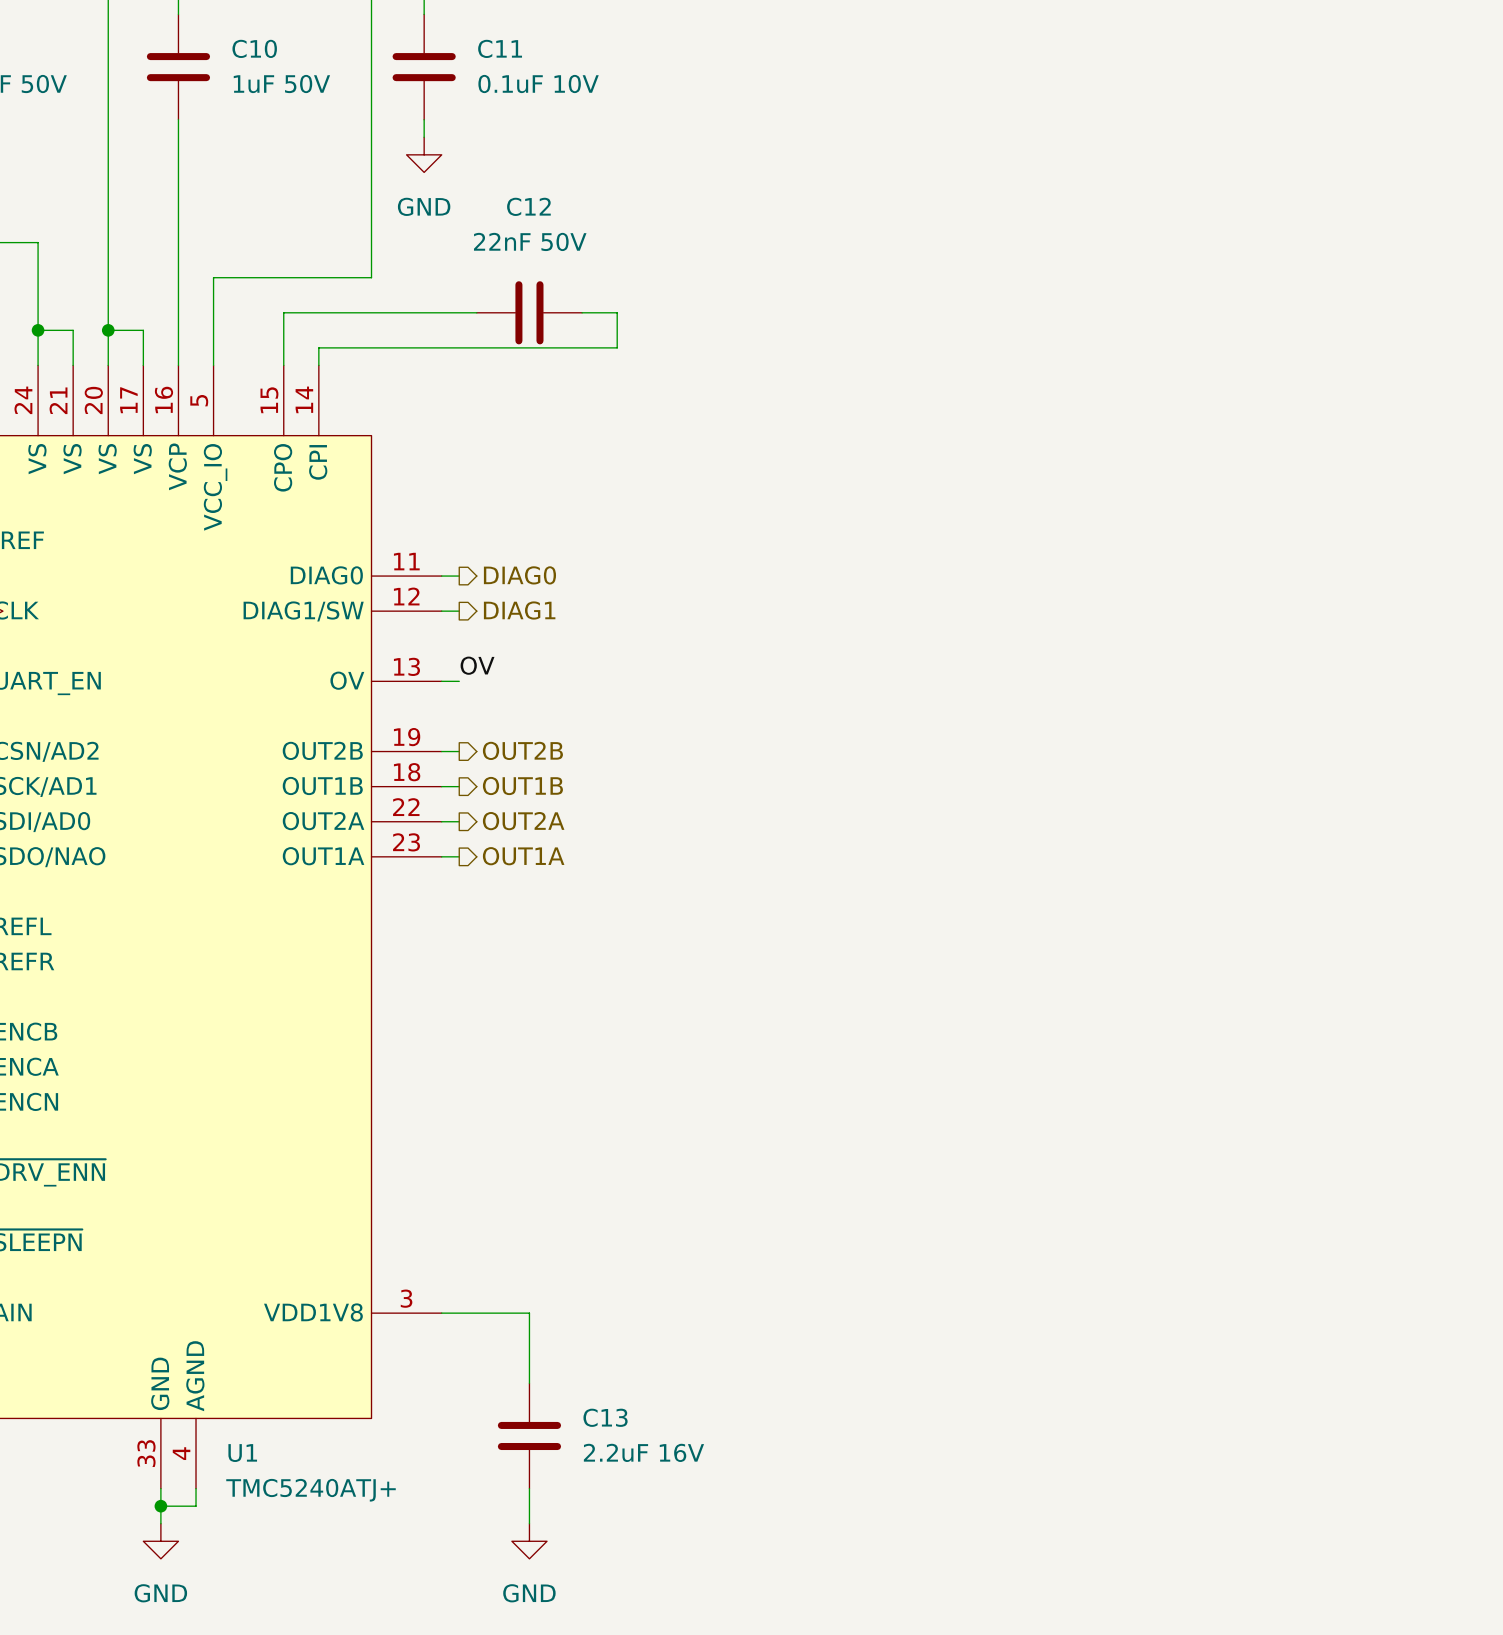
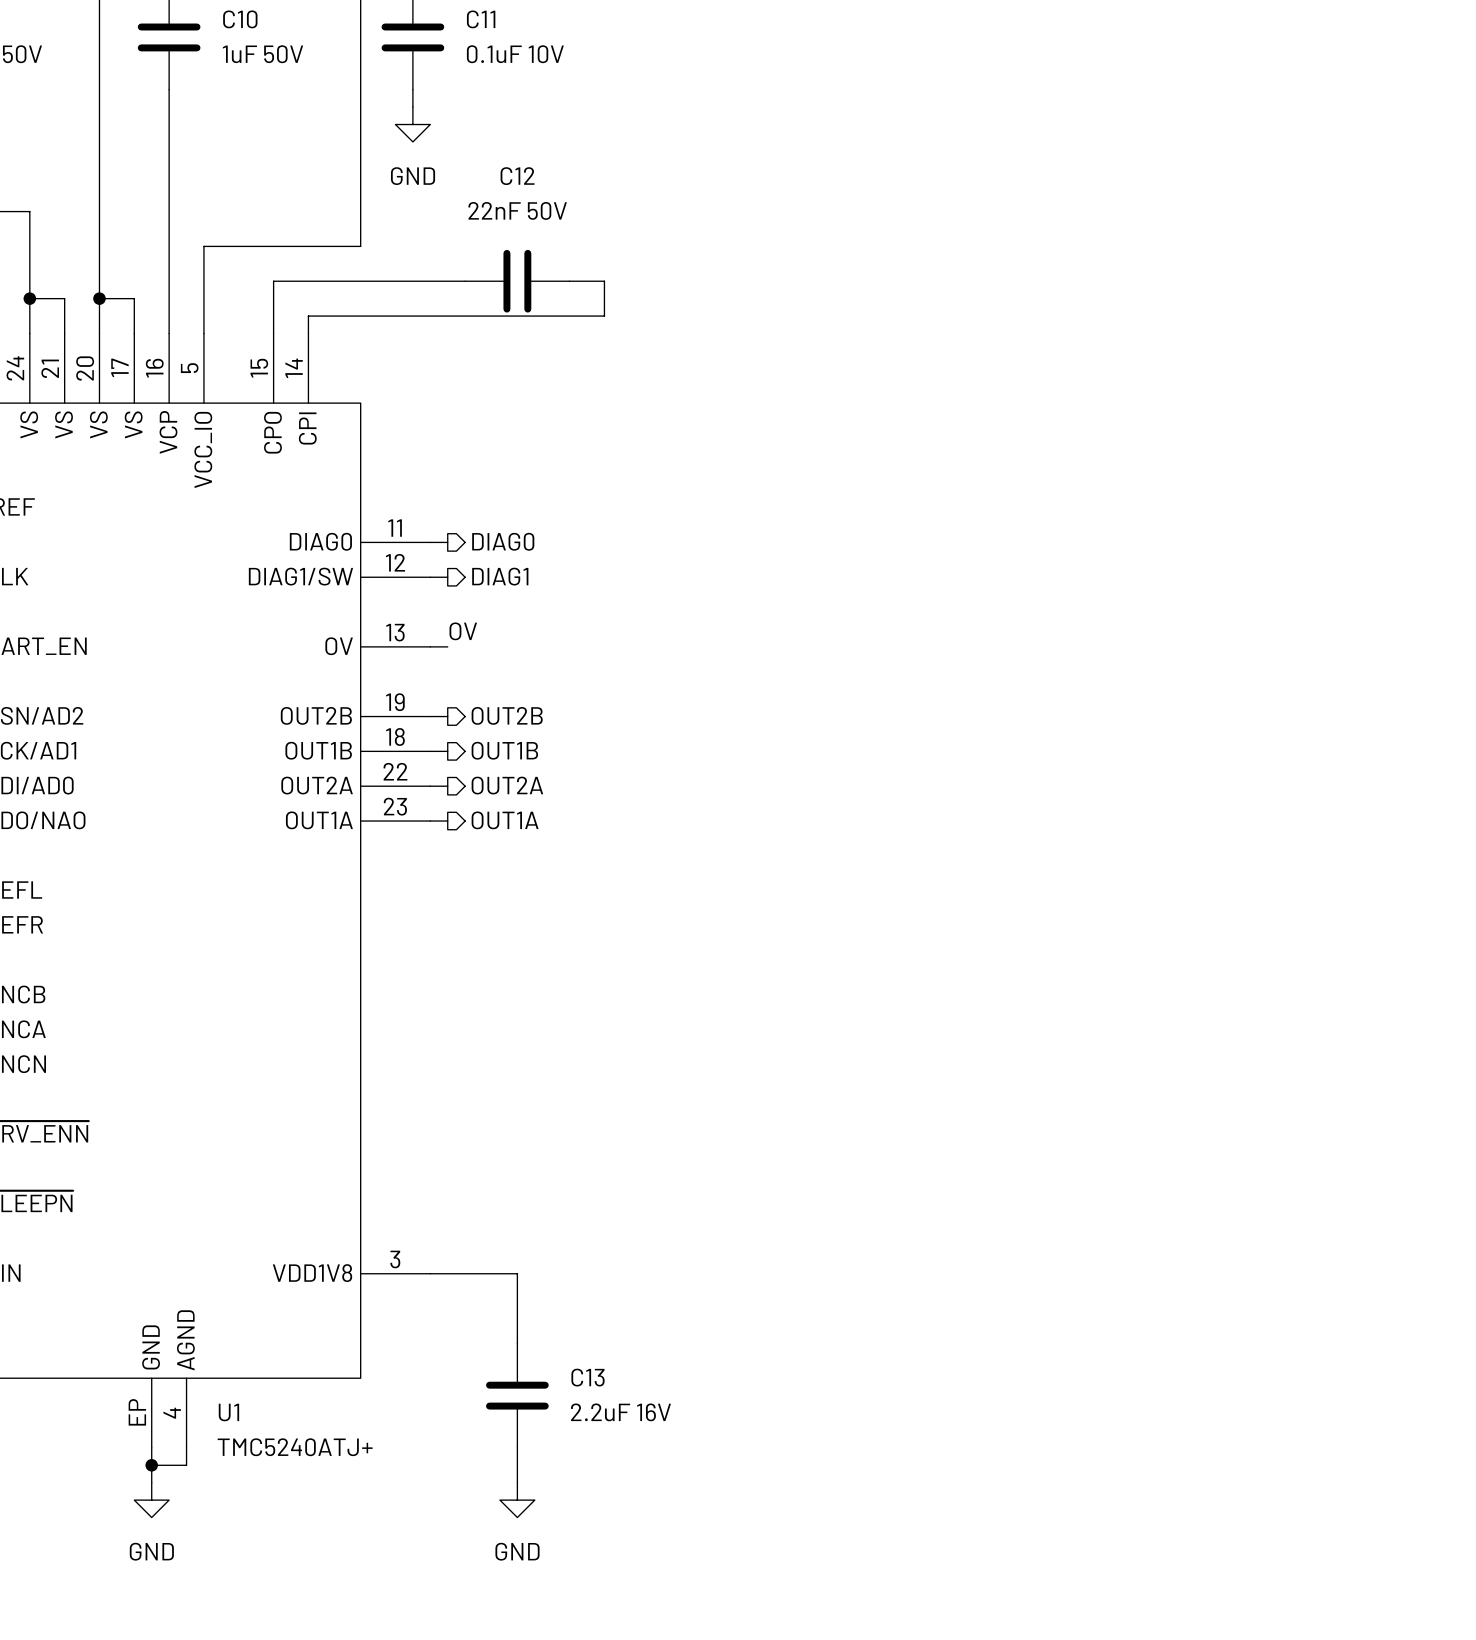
U1 pin number: 33 (146, 1453) -> EP (137, 1412)

